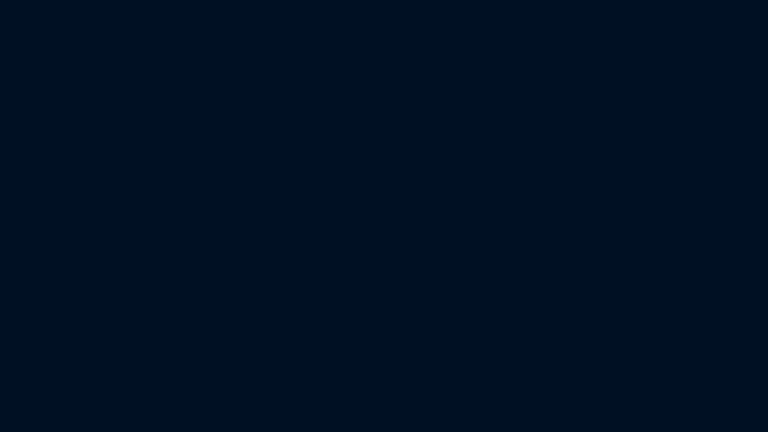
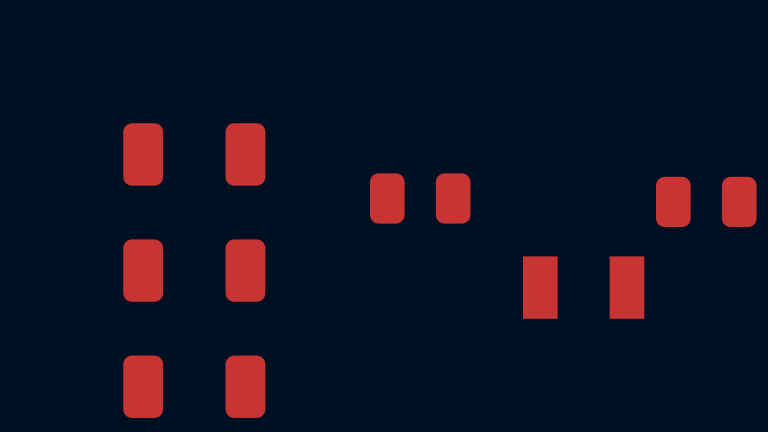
part: none -> (194, 154)
part: none -> (420, 198)
part: none -> (706, 201)
part: none -> (194, 270)
part: none -> (583, 287)
part: none -> (194, 386)

